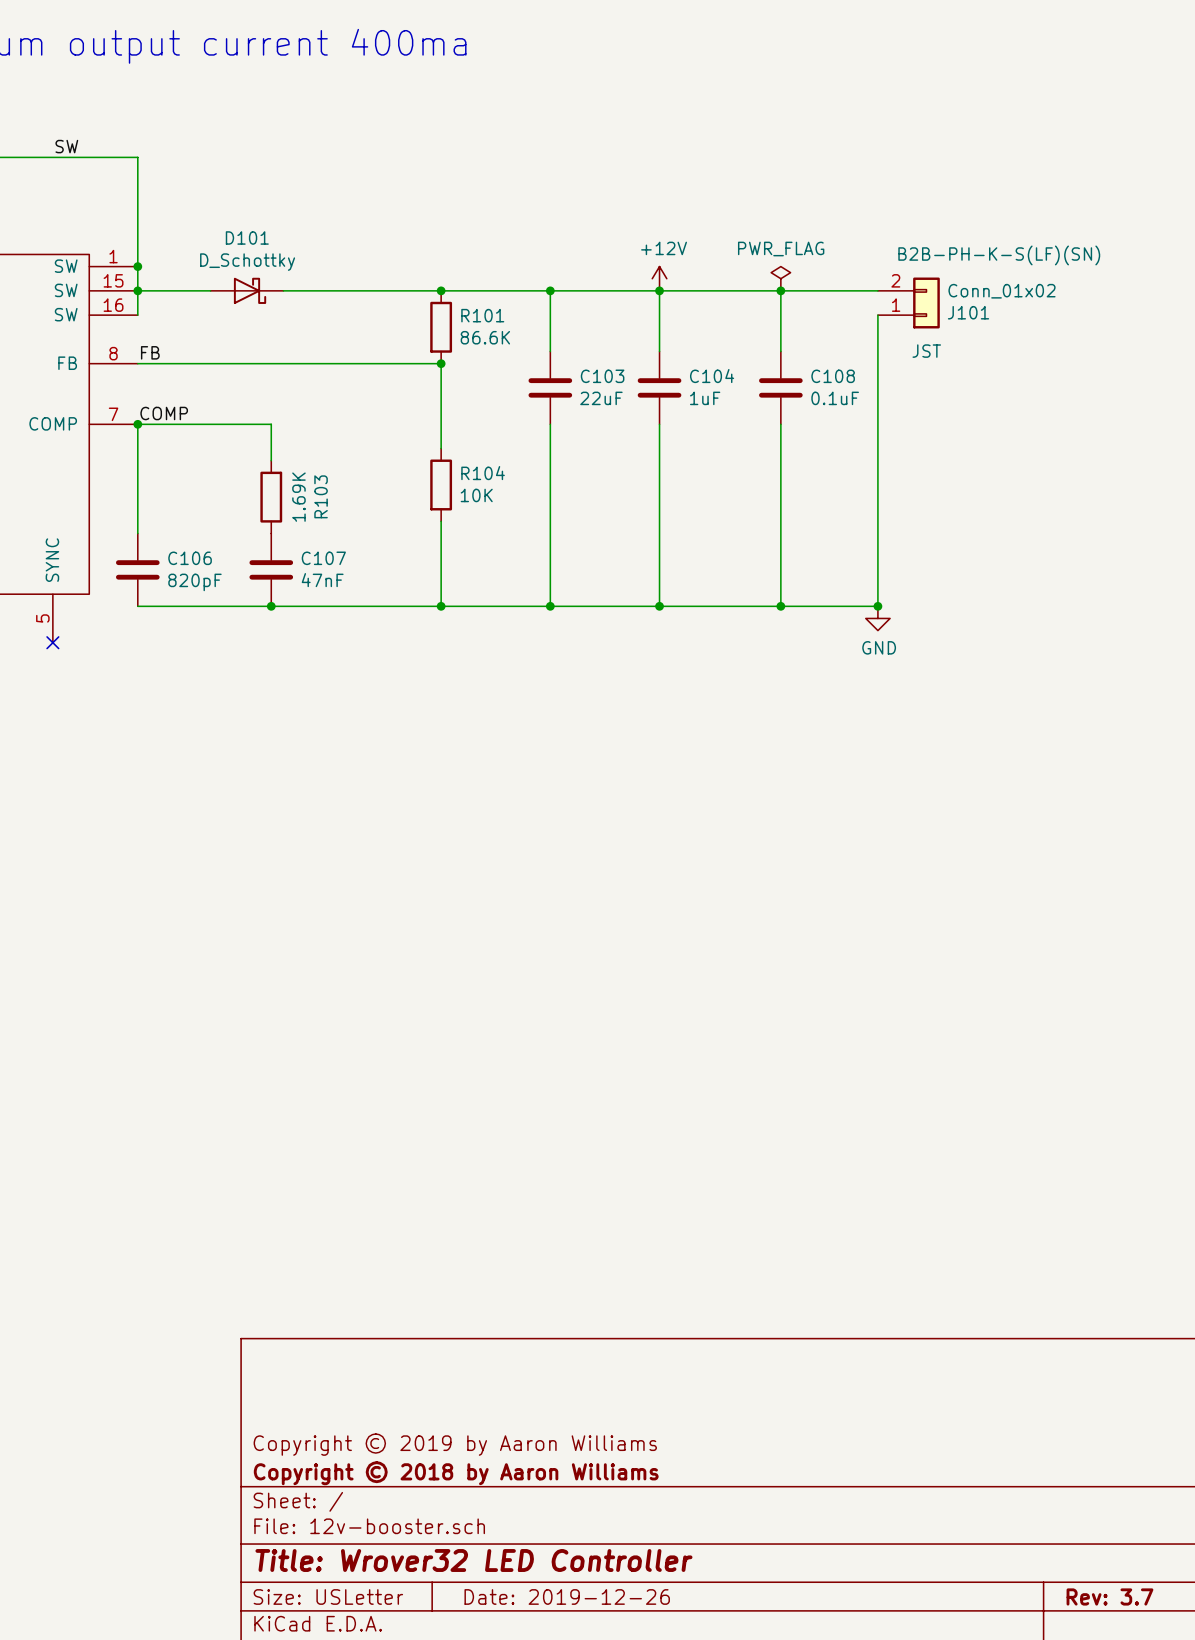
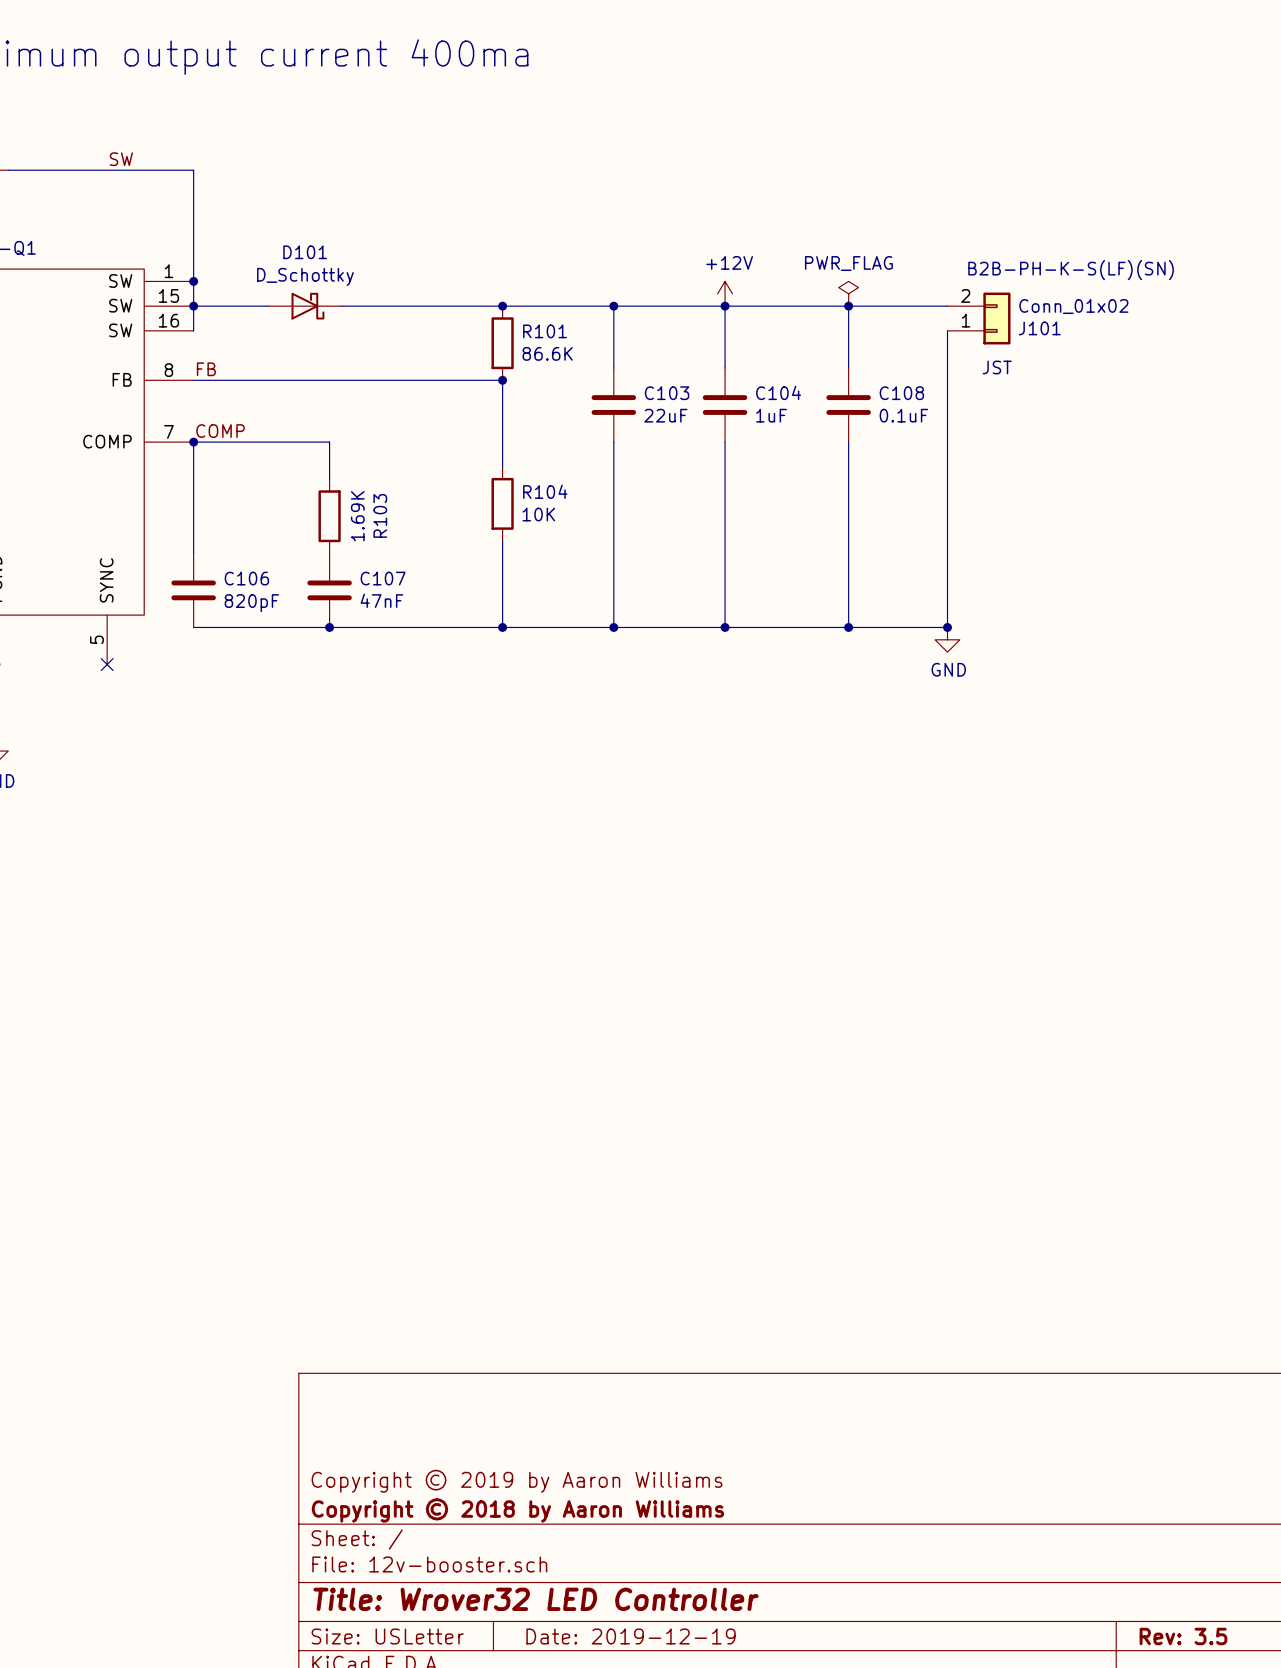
title block: Date: 2019-12-26 (567, 1596) -> Date: 2019-12-19 (631, 1636)
title block: Rev: 3.7 (1109, 1596) -> Rev: 3.5 (1183, 1636)

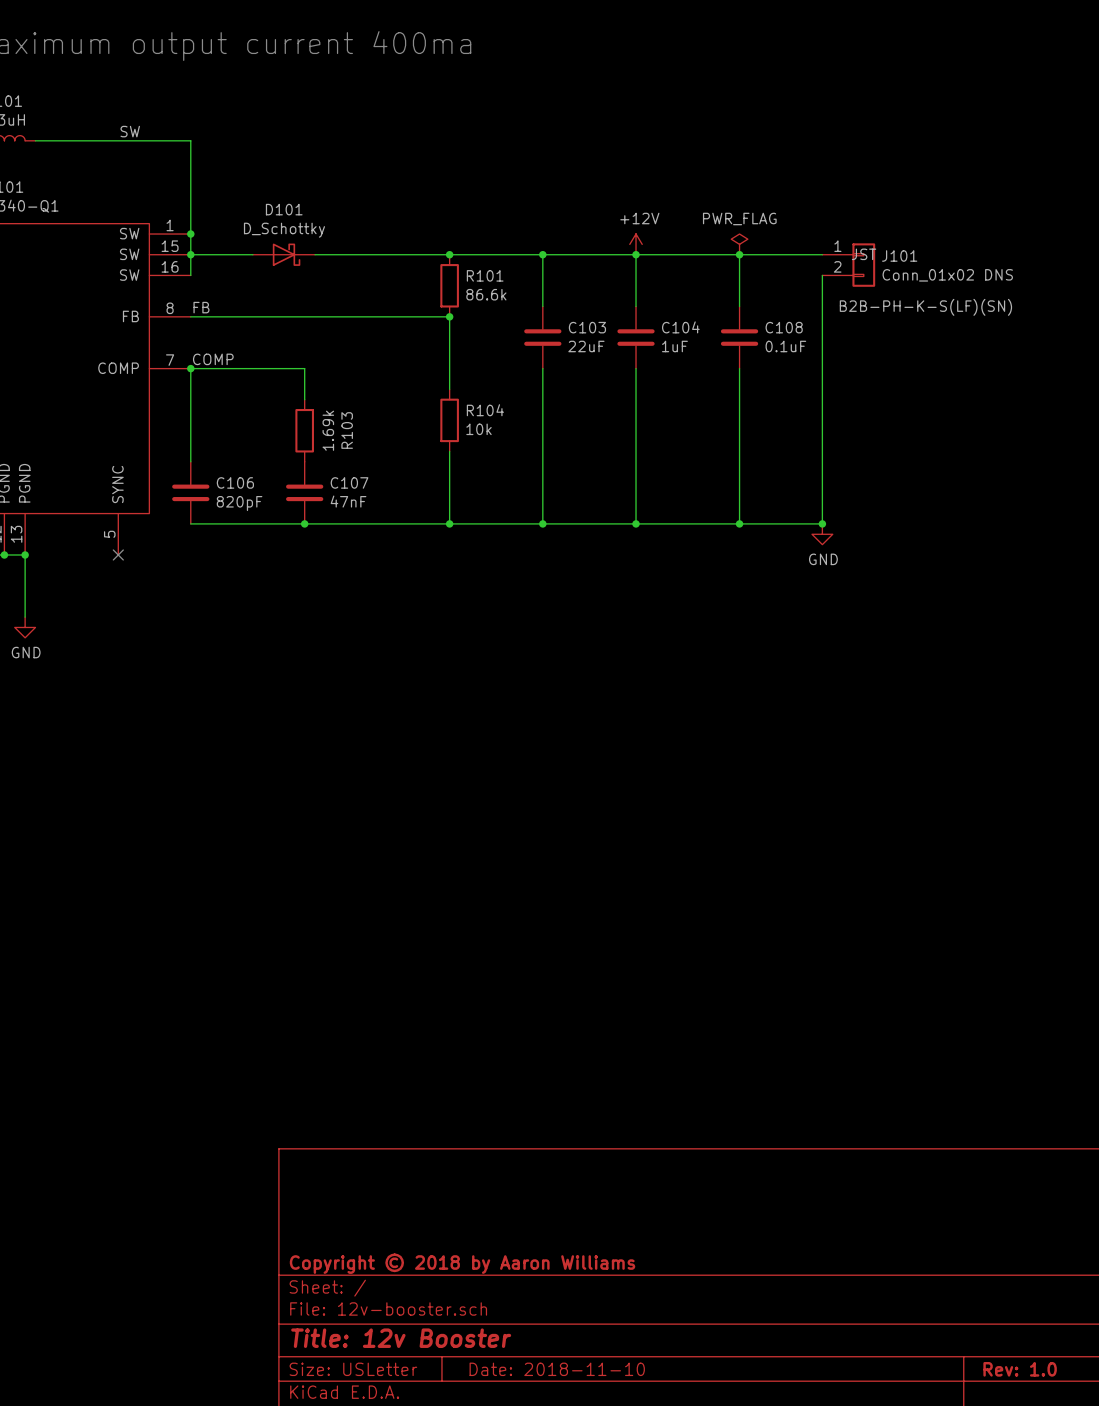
J101 value: Conn_01x02 (1073, 306) -> Conn_01x02 DNS (947, 275)
J101 flip: as is (996, 318) -> up-down (863, 265)
R101 value: 86.6K (547, 353) -> 86.6k (486, 294)
J101 text position: JST (997, 367) -> JST (864, 254)
R104 value: 10K (538, 514) -> 10k (479, 429)
R103 value: 1.69K (357, 516) -> 1.69k (328, 430)
title block: Copyright © 2019 by Aaron Williams (517, 1481) -> none
title block: Title: Wrover32 LED Controller (536, 1599) -> Title: 12v Booster (401, 1338)
title block: Date: 2019-12-19 (631, 1636) -> Date: 2018-11-10 (557, 1369)
title block: Rev: 3.5 (1183, 1636) -> Rev: 1.0 (1020, 1369)

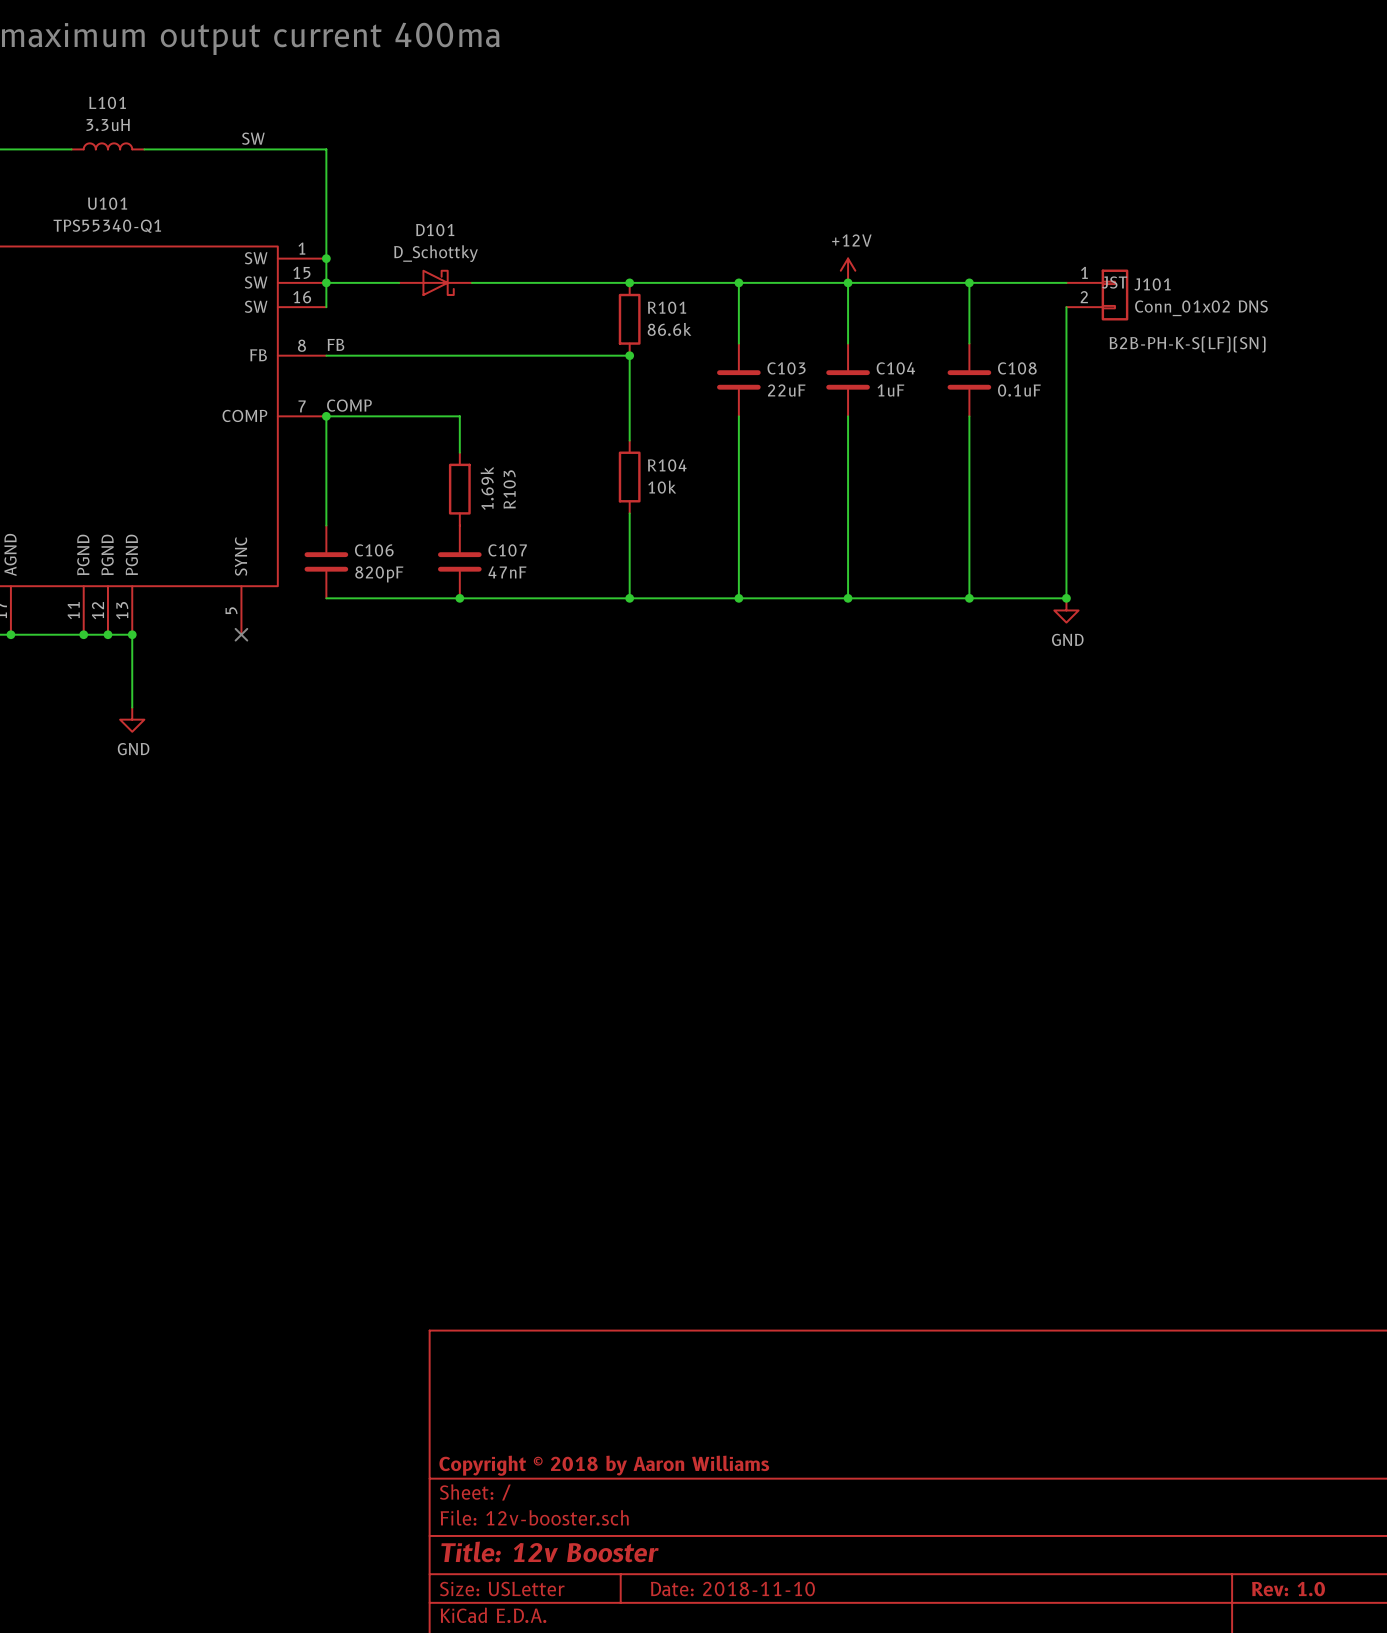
power symbol: PWR_FLAG (739, 244) -> none

